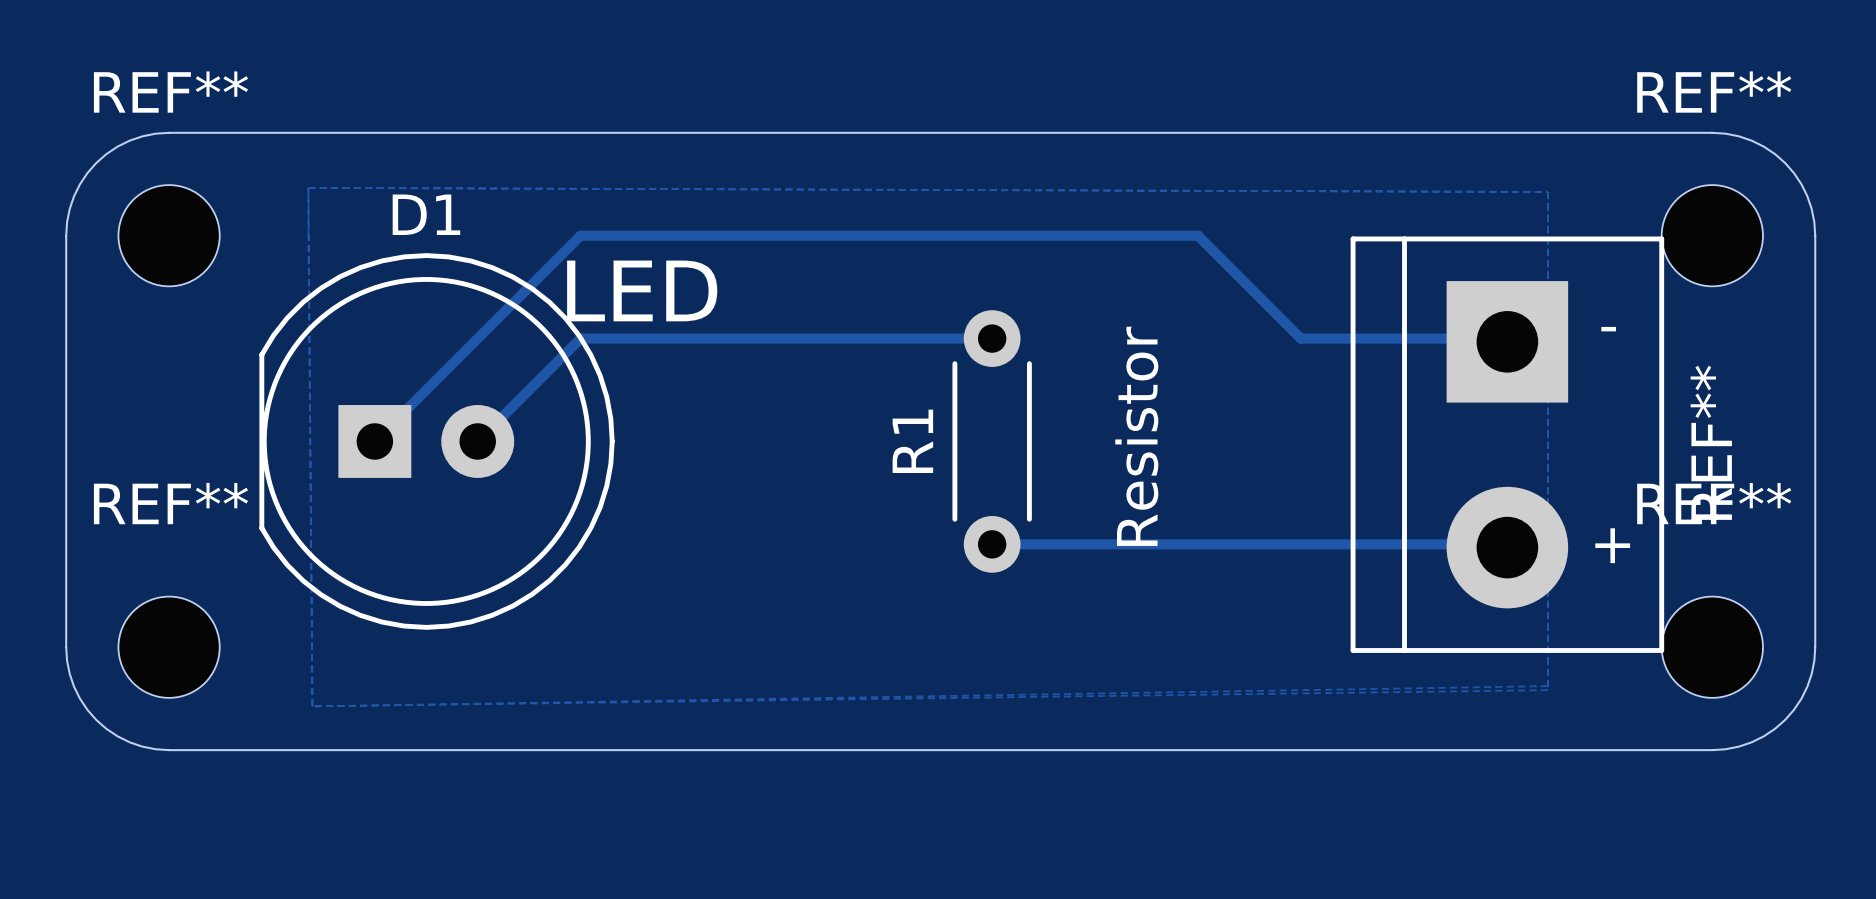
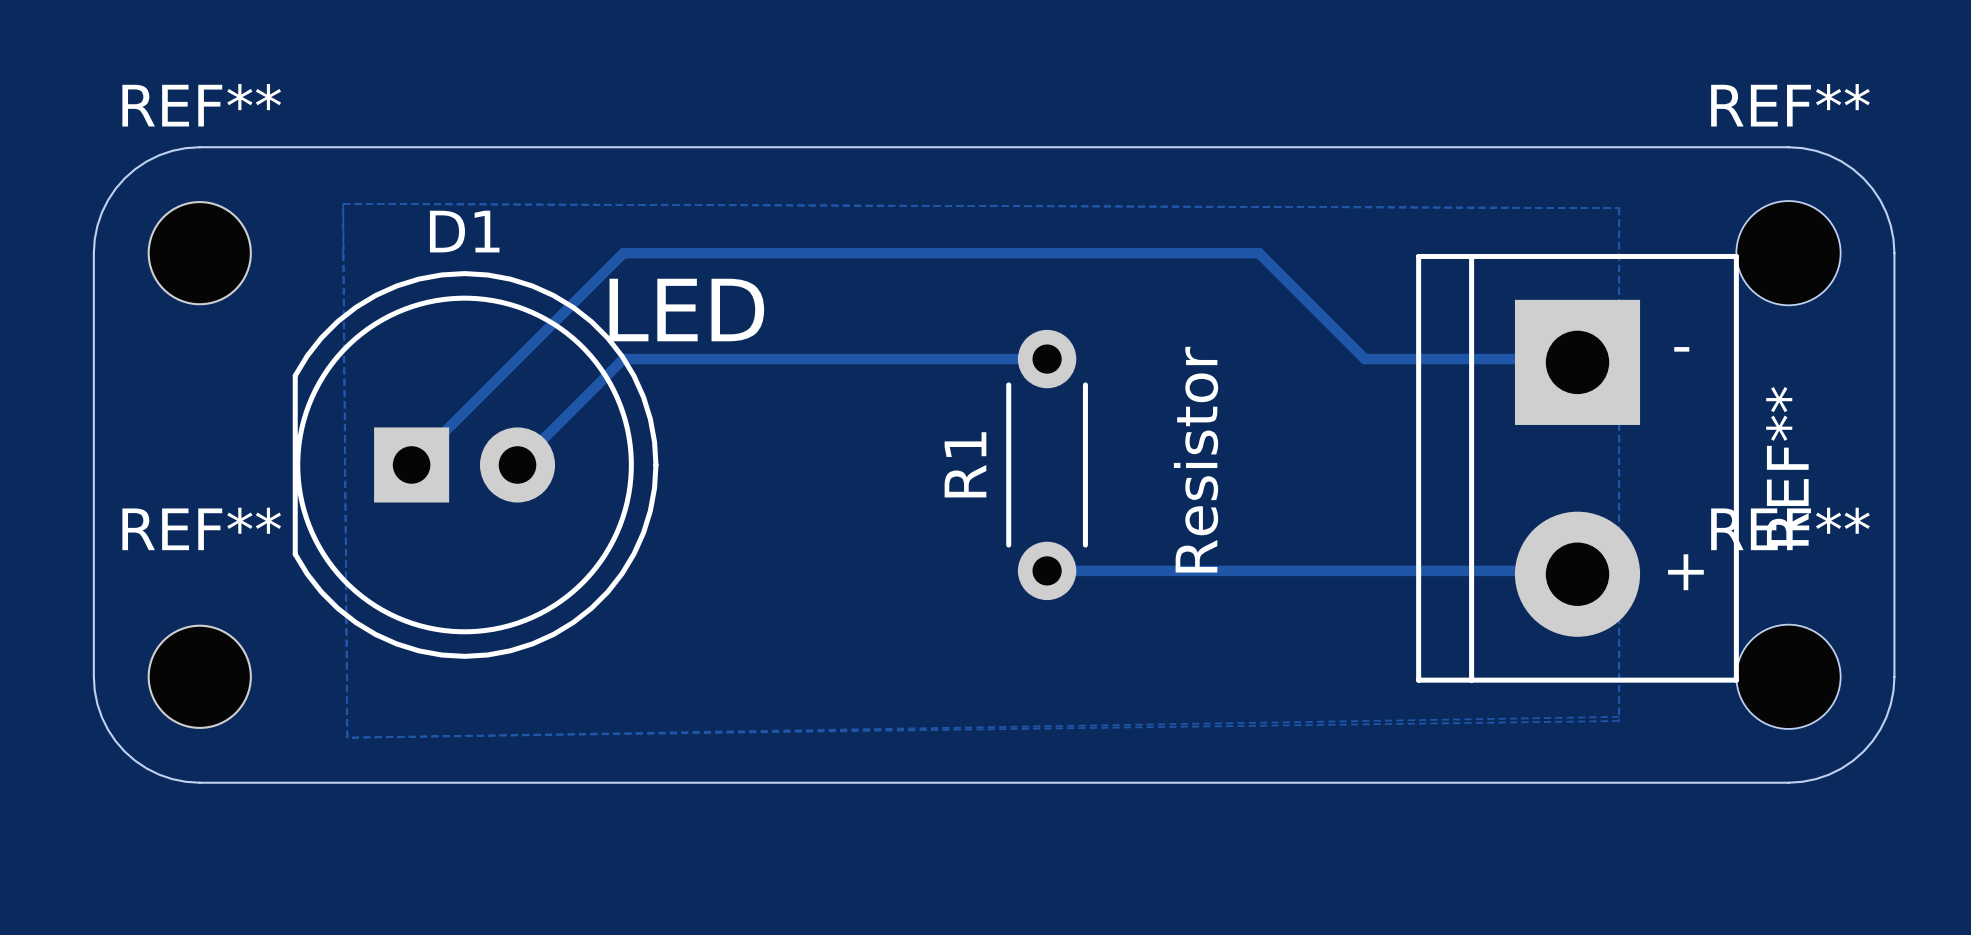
REF** footprint: [118, 185, 220, 287] -> [147, 201, 252, 306]
REF** footprint: [118, 596, 220, 698] -> [147, 624, 252, 729]

